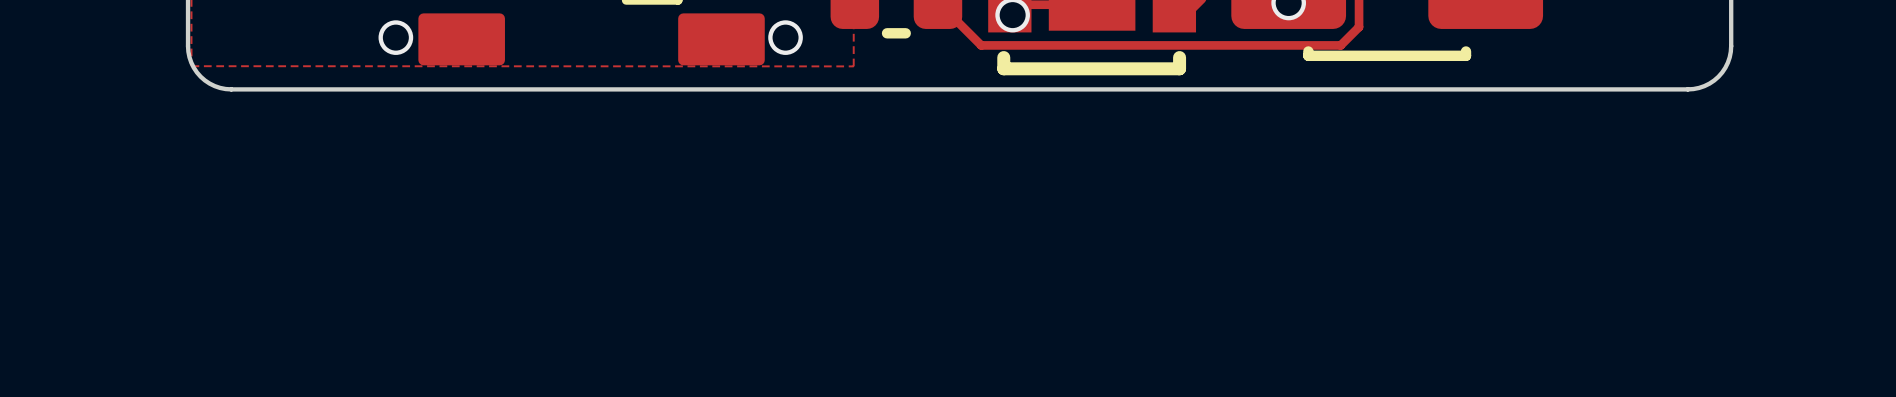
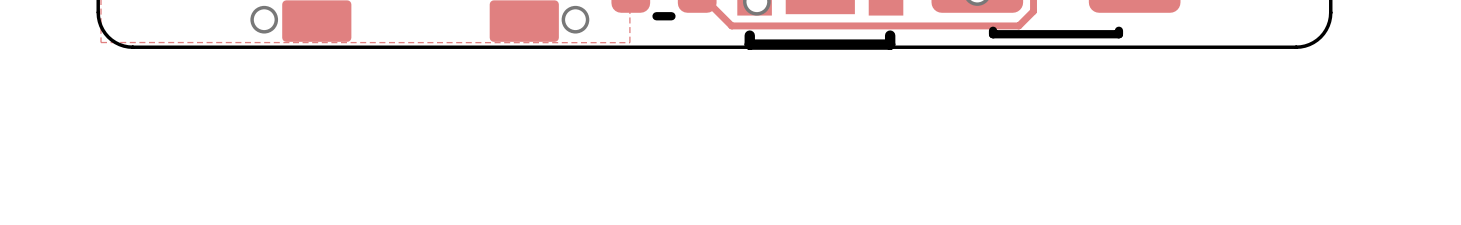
board edge: (188, 28) (189, 57) (196, 72) (209, 83) (231, 89) (1687, 89) (1709, 83) (1722, 72) (1729, 57) (1731, 28) -> (98, 12) (100, 25) (108, 37) (119, 44) (132, 47) (1296, 47) (1309, 44) (1320, 37) (1328, 25) (1330, 12)

